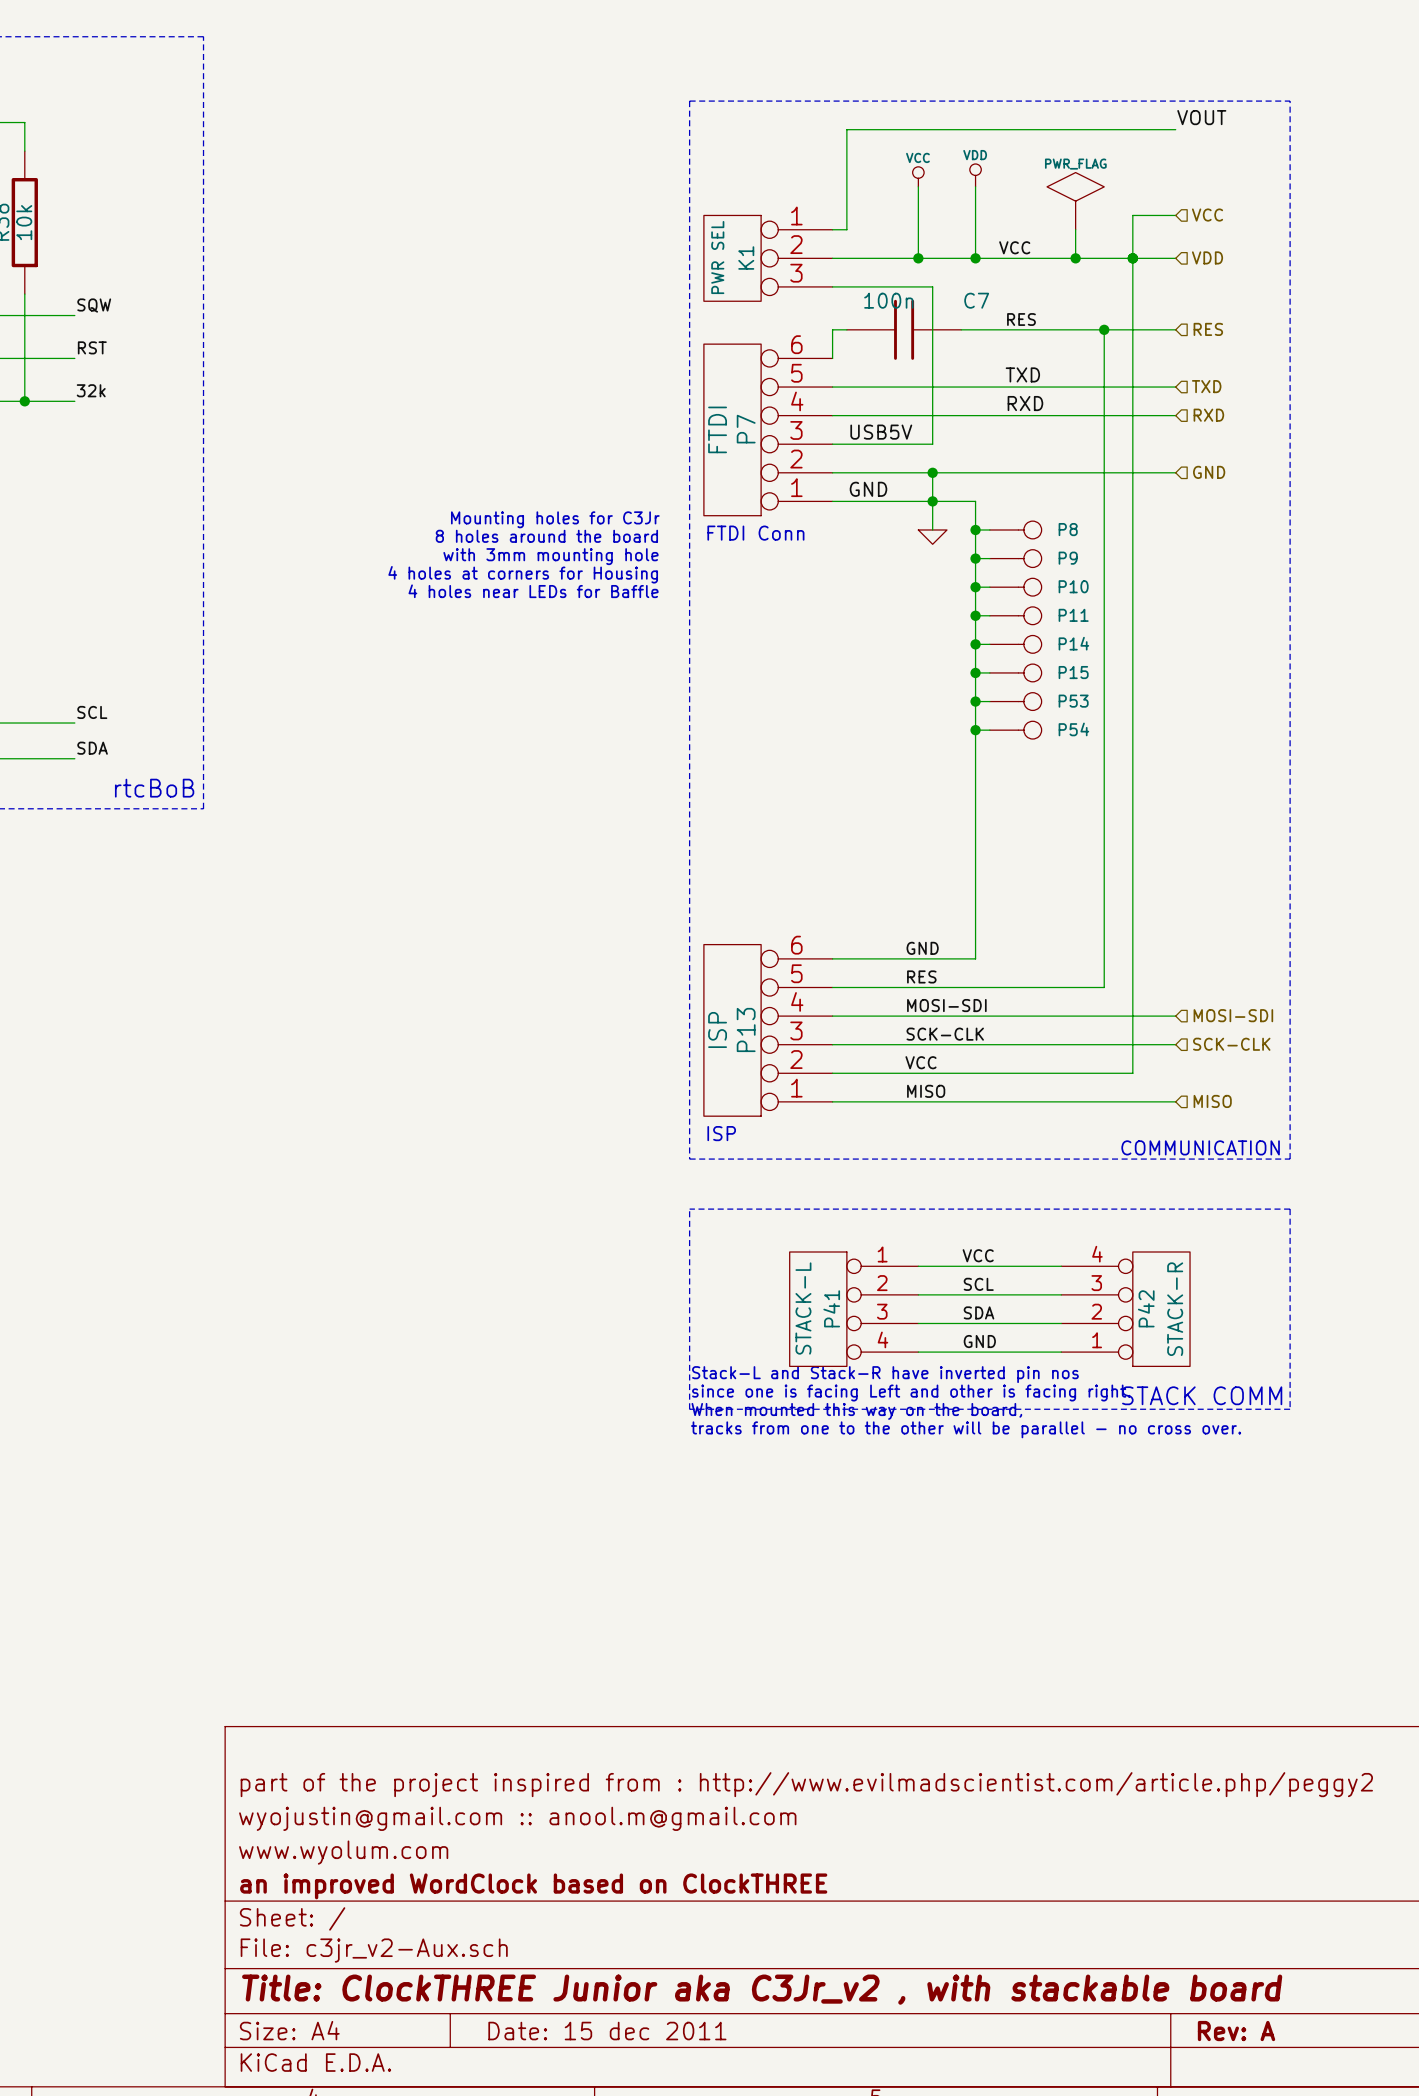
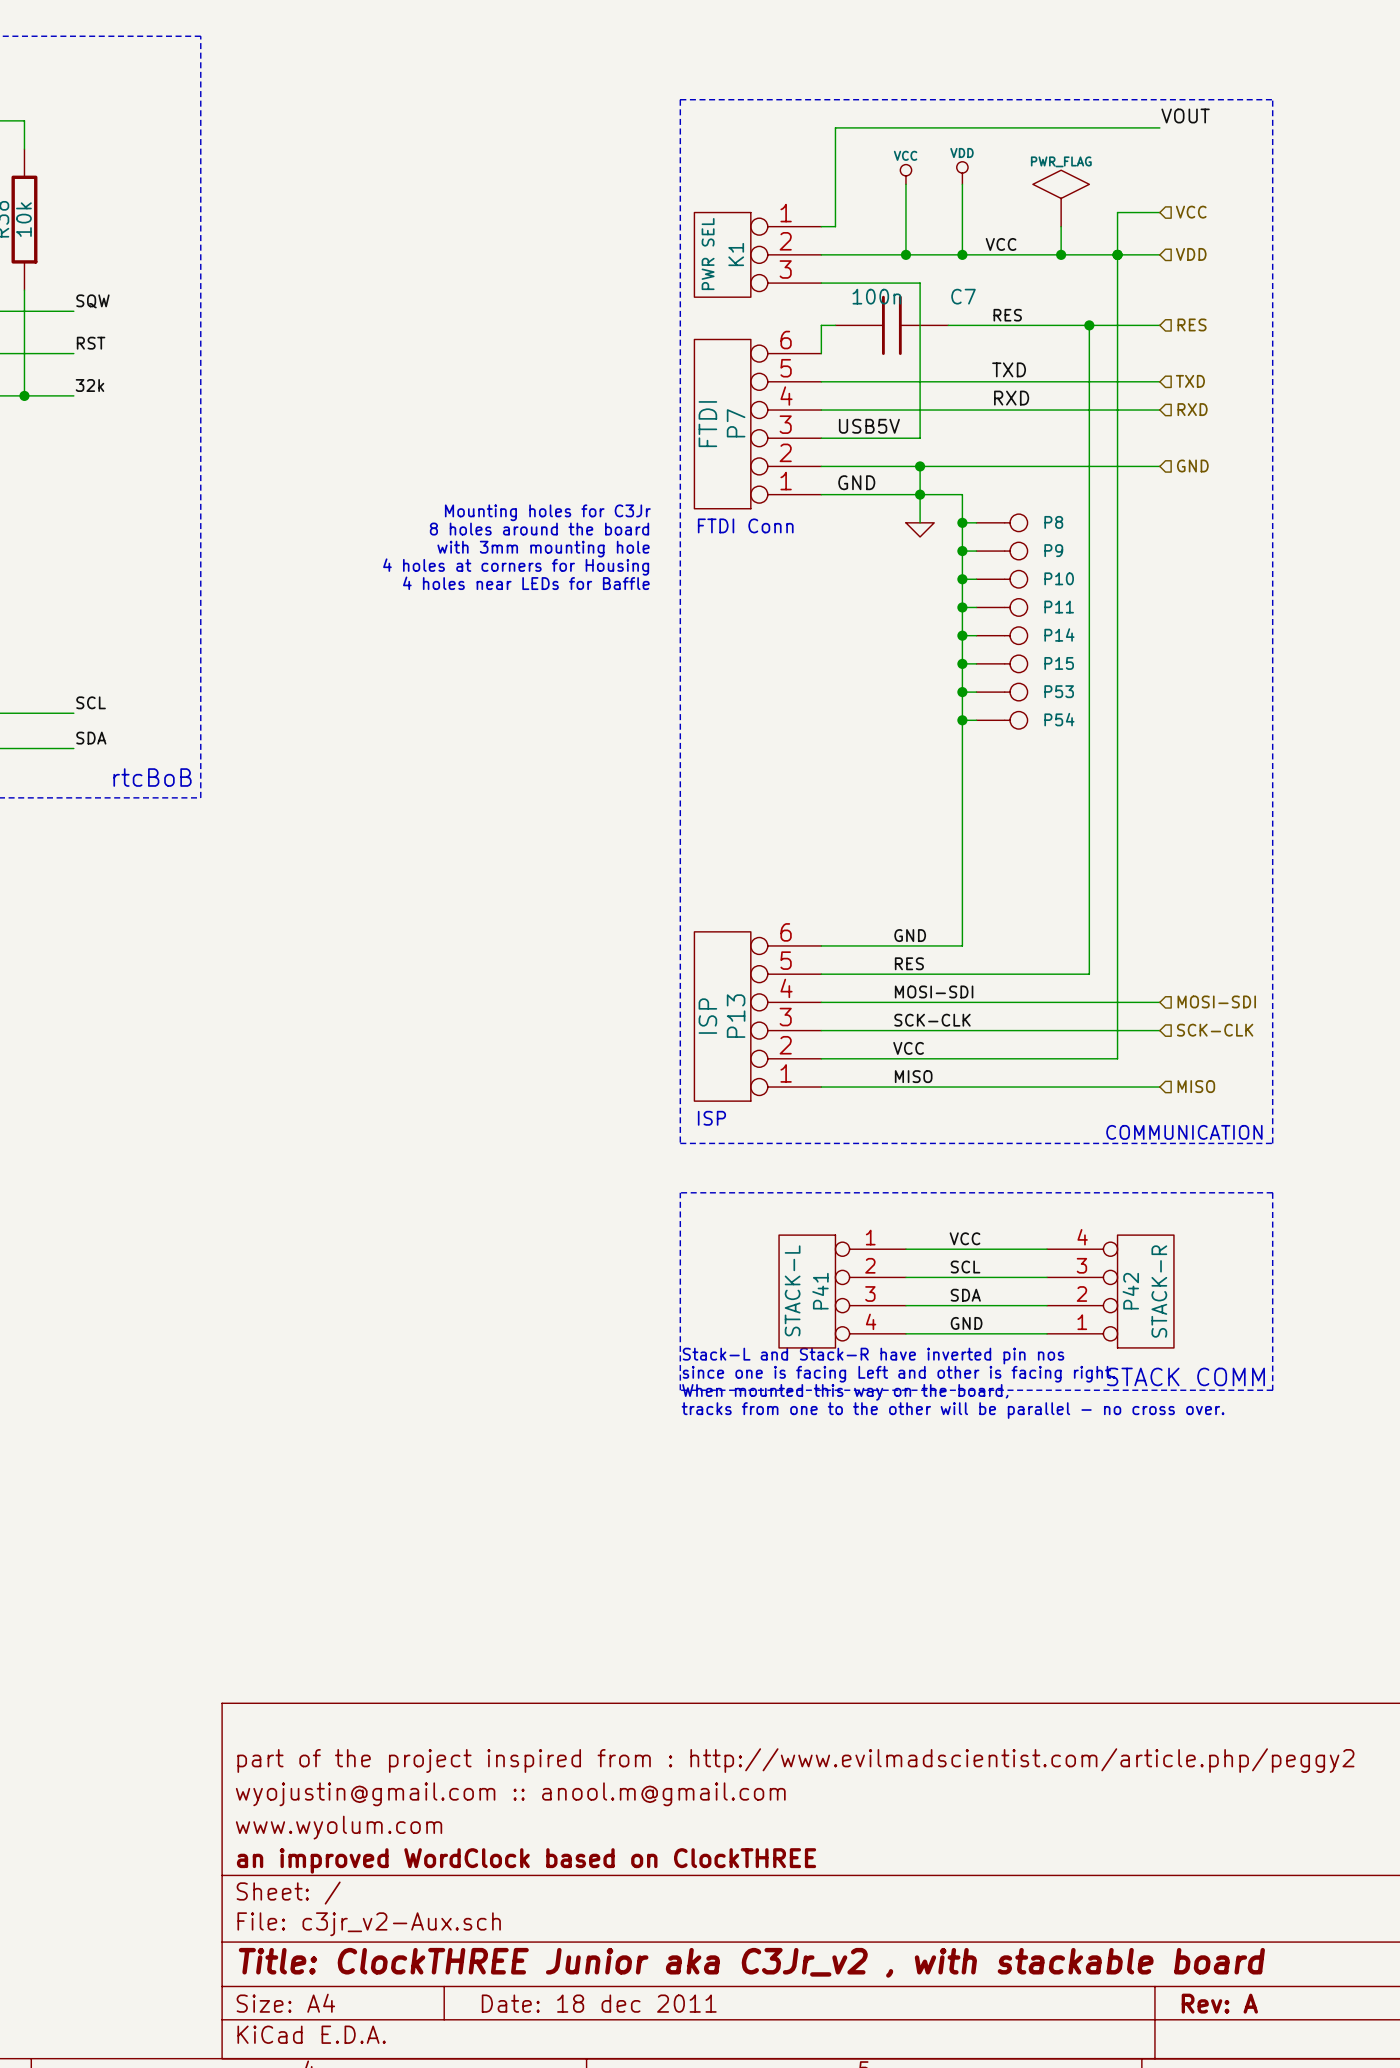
title block: Date: 15 dec 2011 (607, 2031) -> Date: 18 dec 2011 (599, 2003)

